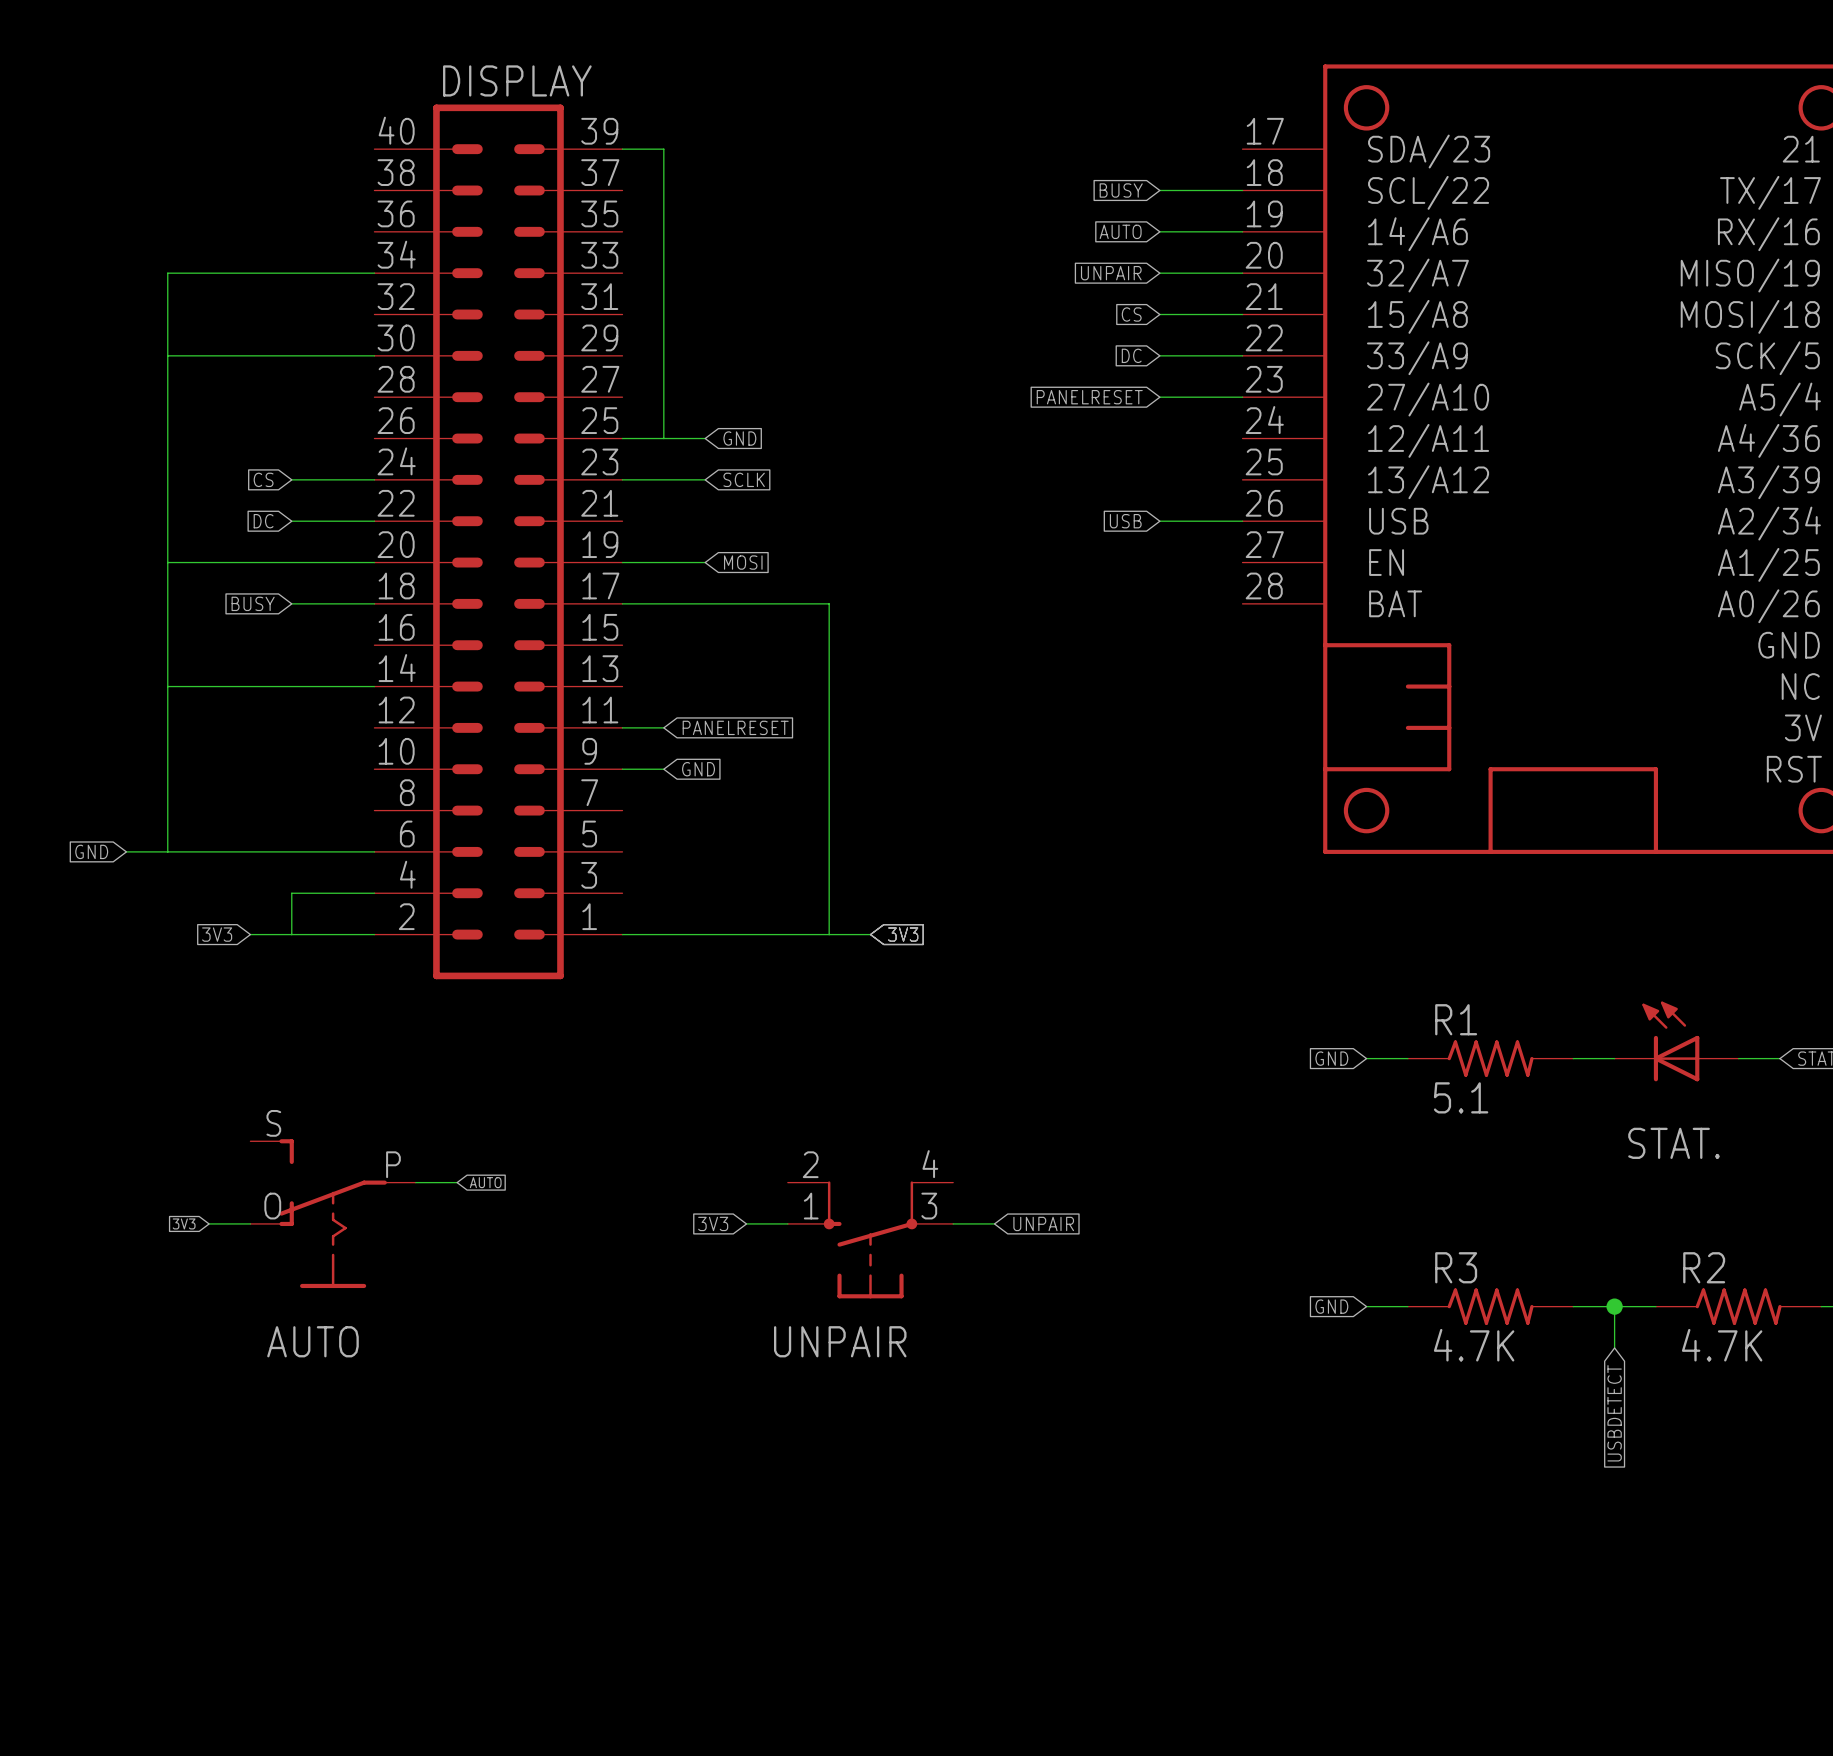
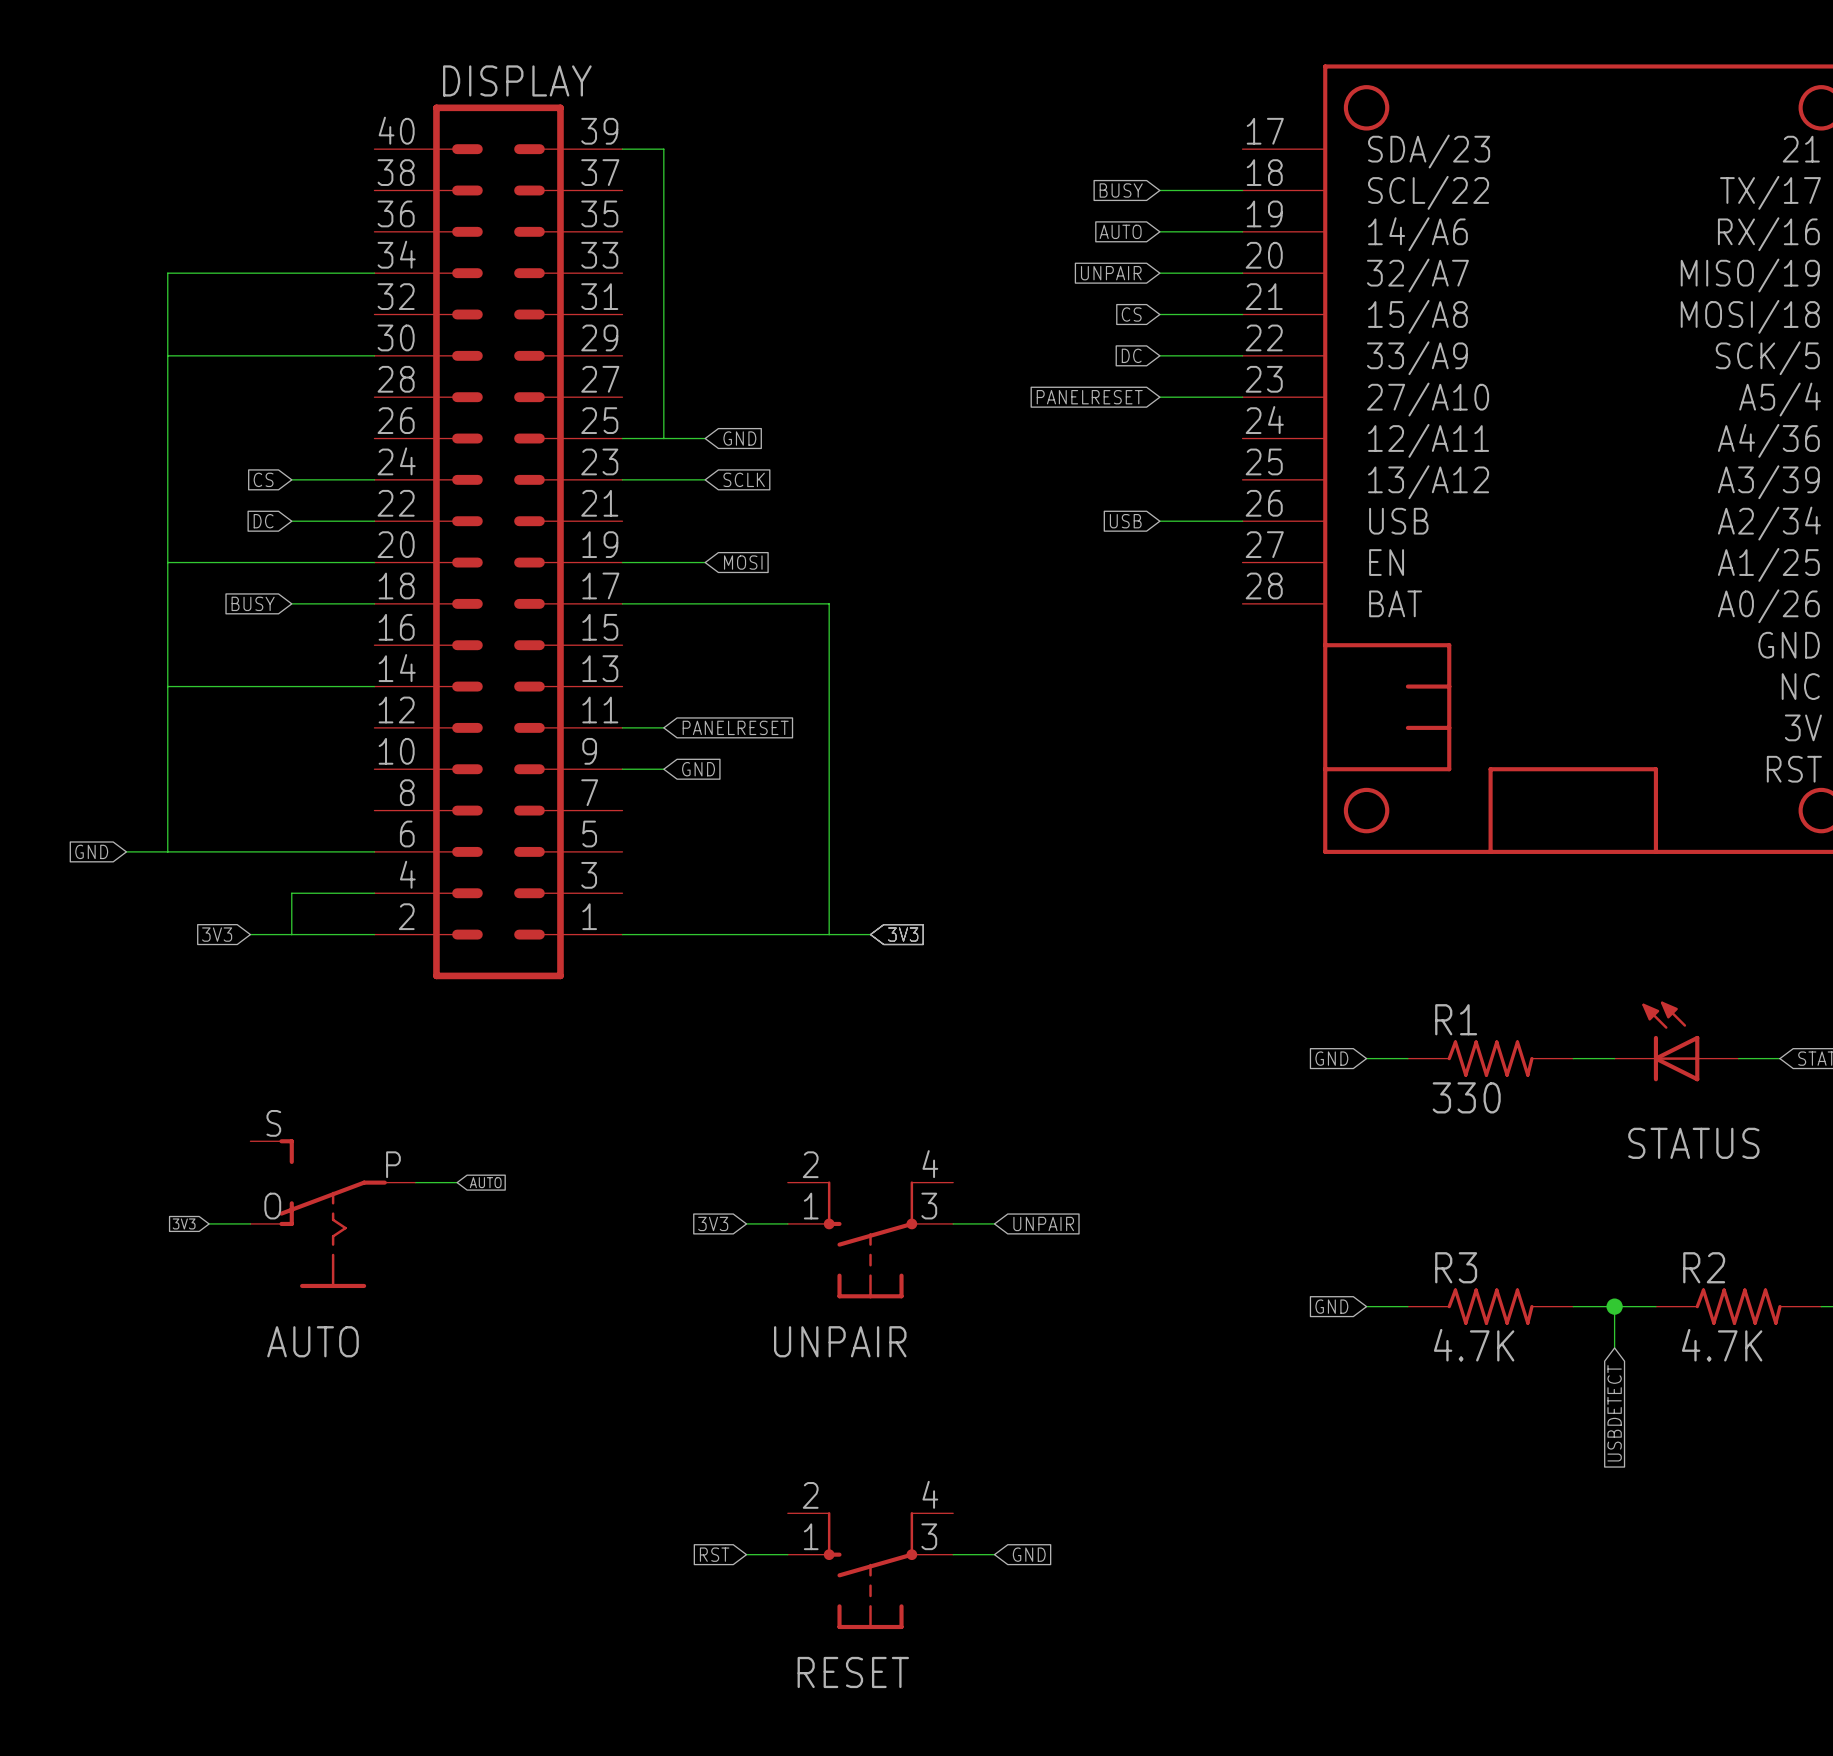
R1 value: 5.1 (1461, 1097) -> 330 (1466, 1097)
STAT. name: STAT. (1674, 1143) -> STATUS (1693, 1143)
global label: none -> RST (714, 1554)
wire: none -> (746, 1554) (787, 1554)
wire: none -> (953, 1554) (994, 1554)
global label: none -> GND (1029, 1554)
RESET: none -> (870, 1570)

